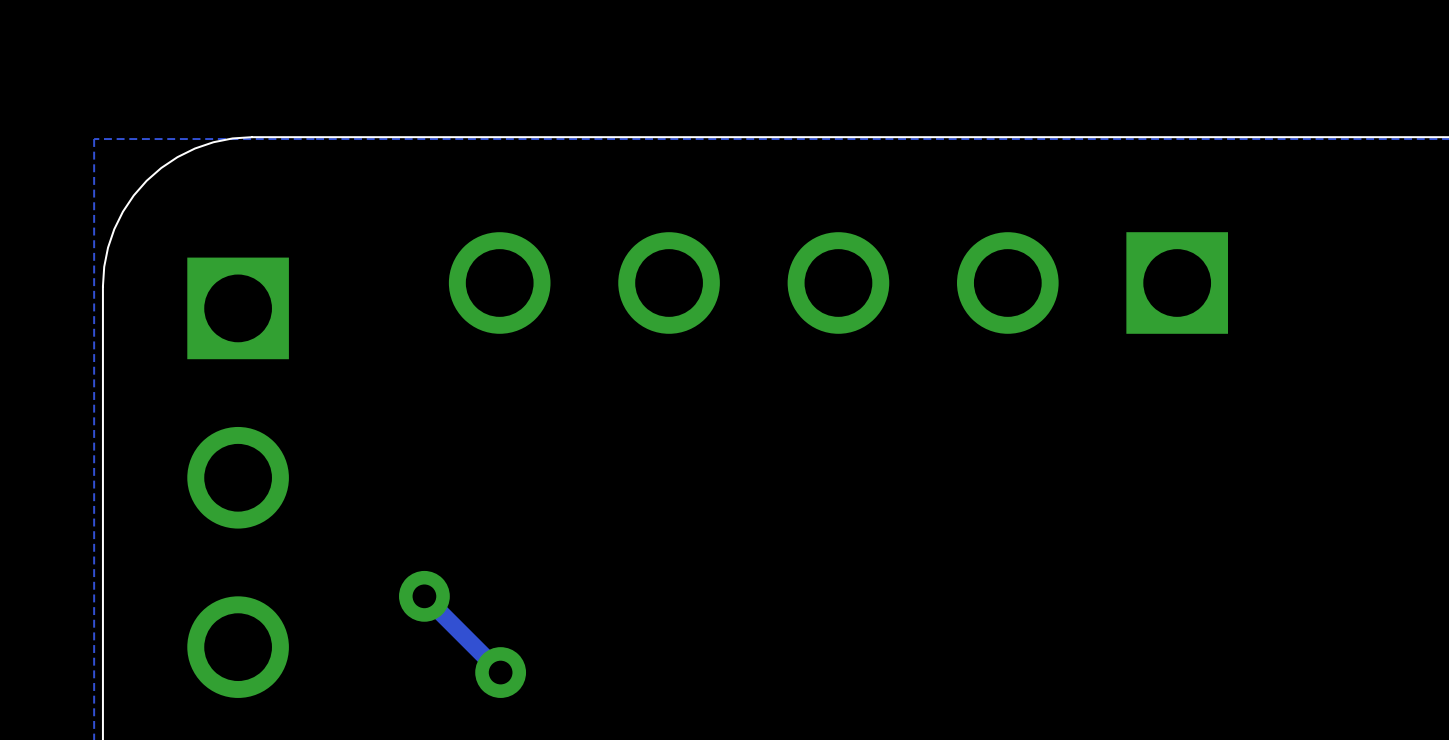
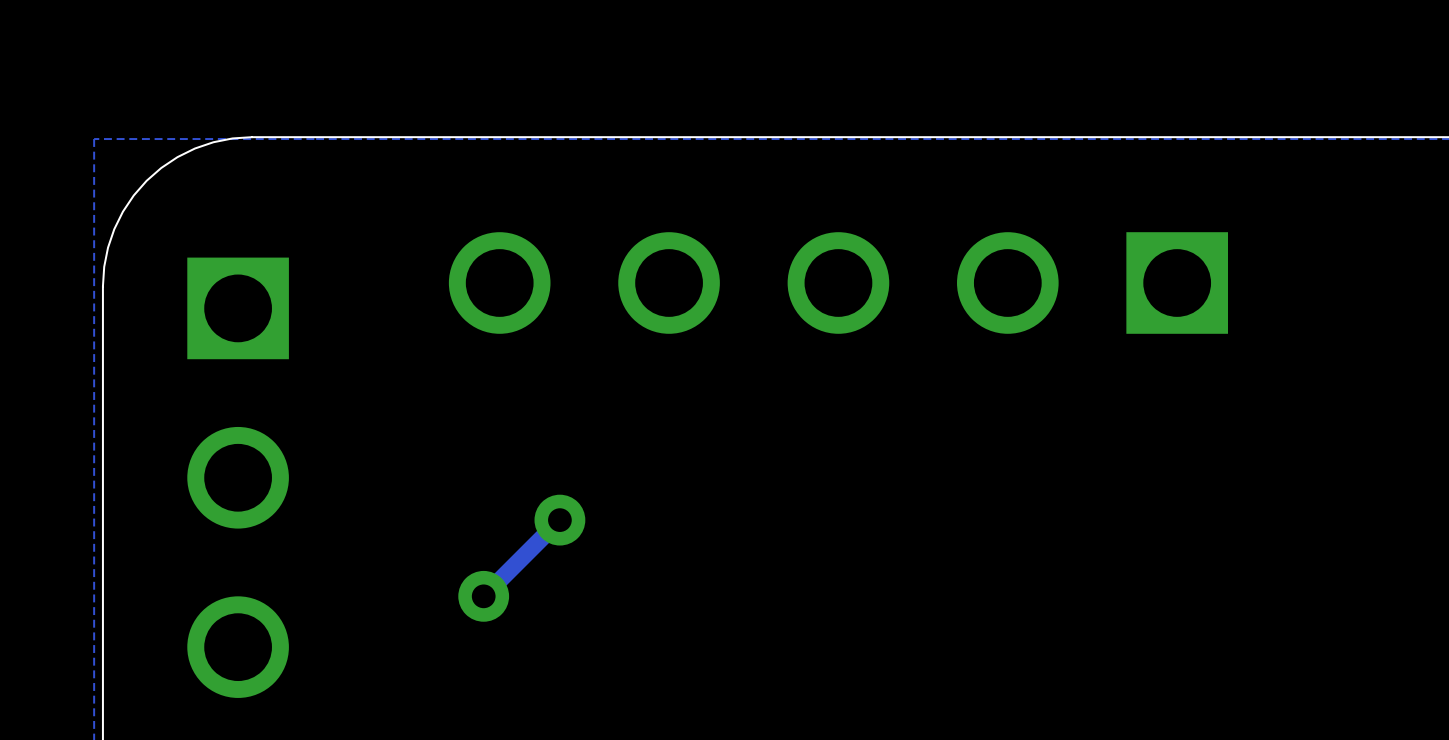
track: none -> (559, 520) (483, 596)
via: none -> (559, 520)
track: (424, 596) (500, 672) -> none
via: (424, 596) -> none
via: none -> (483, 596)
via: (500, 672) -> none

